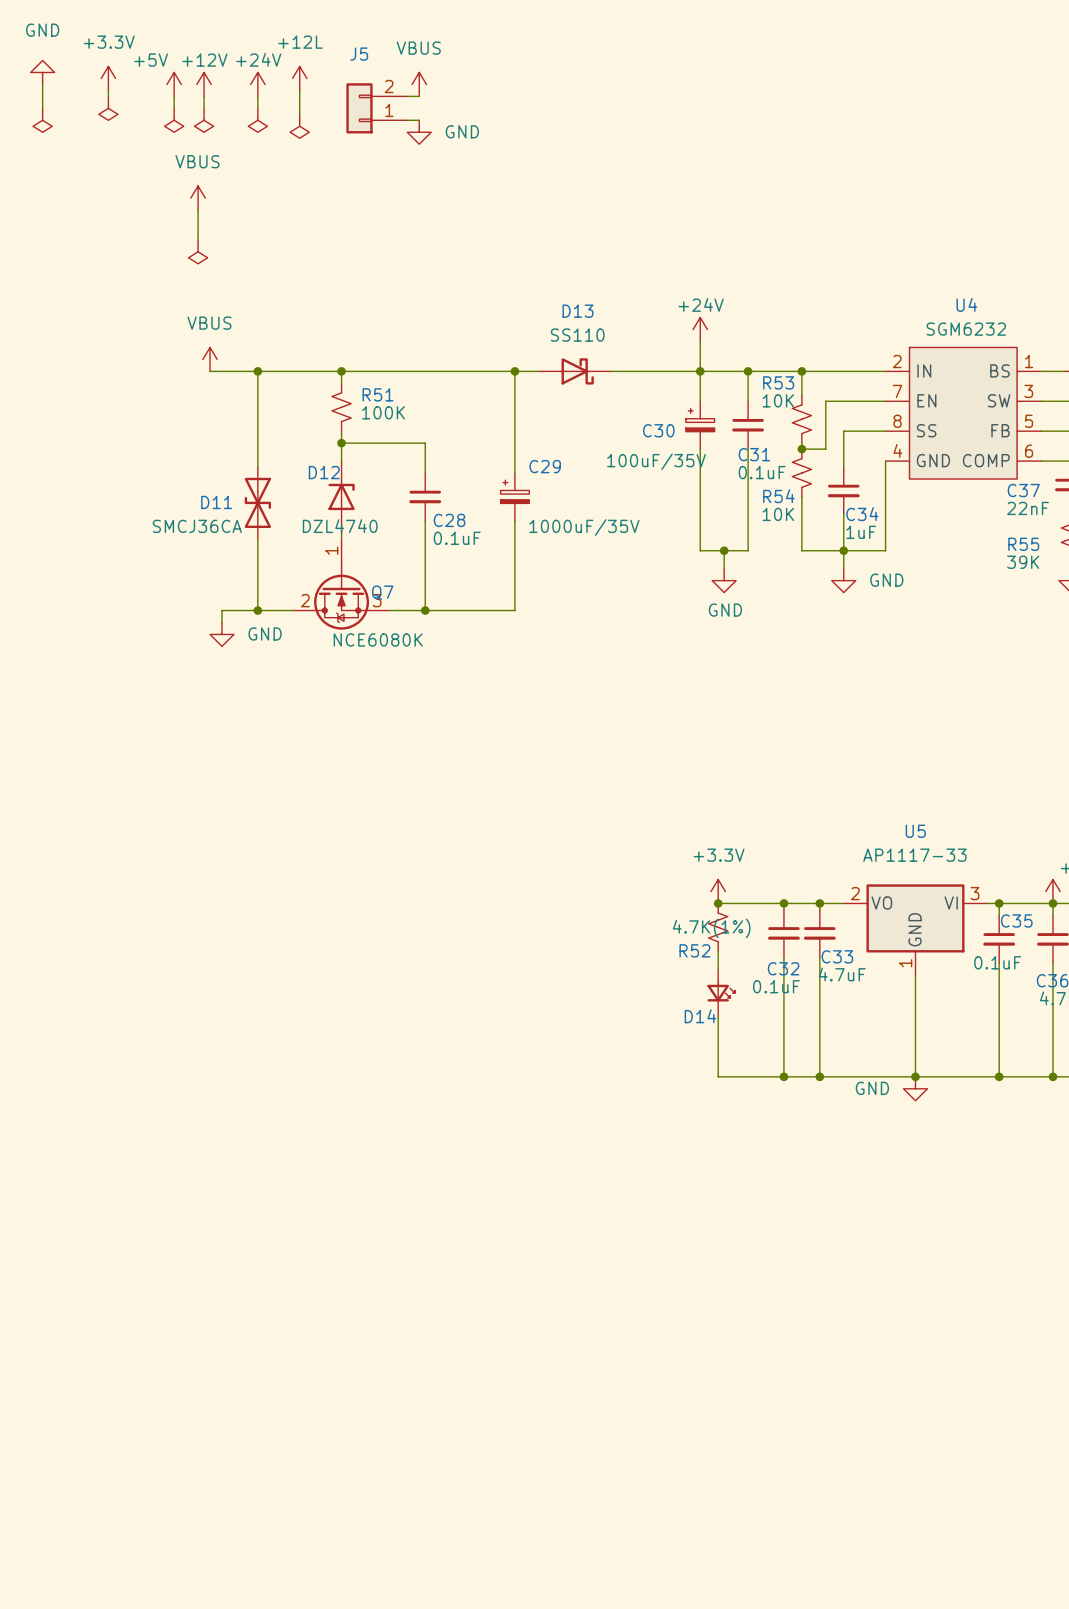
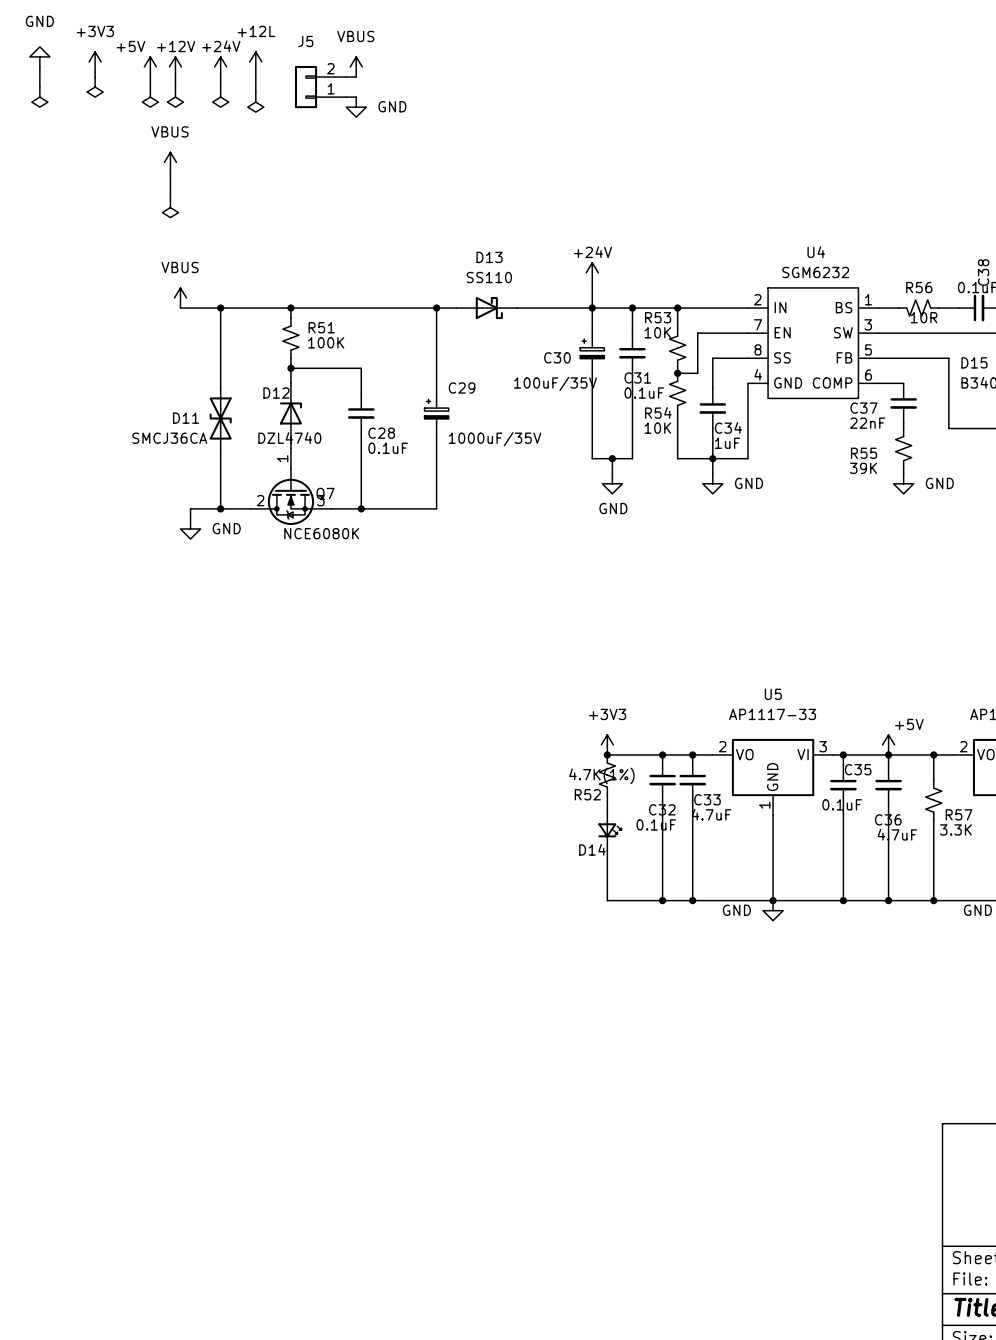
power symbol: +3.3V (108, 78) -> +3V3 (95, 61)
power symbol: +3.3V (718, 891) -> +3V3 (607, 744)

